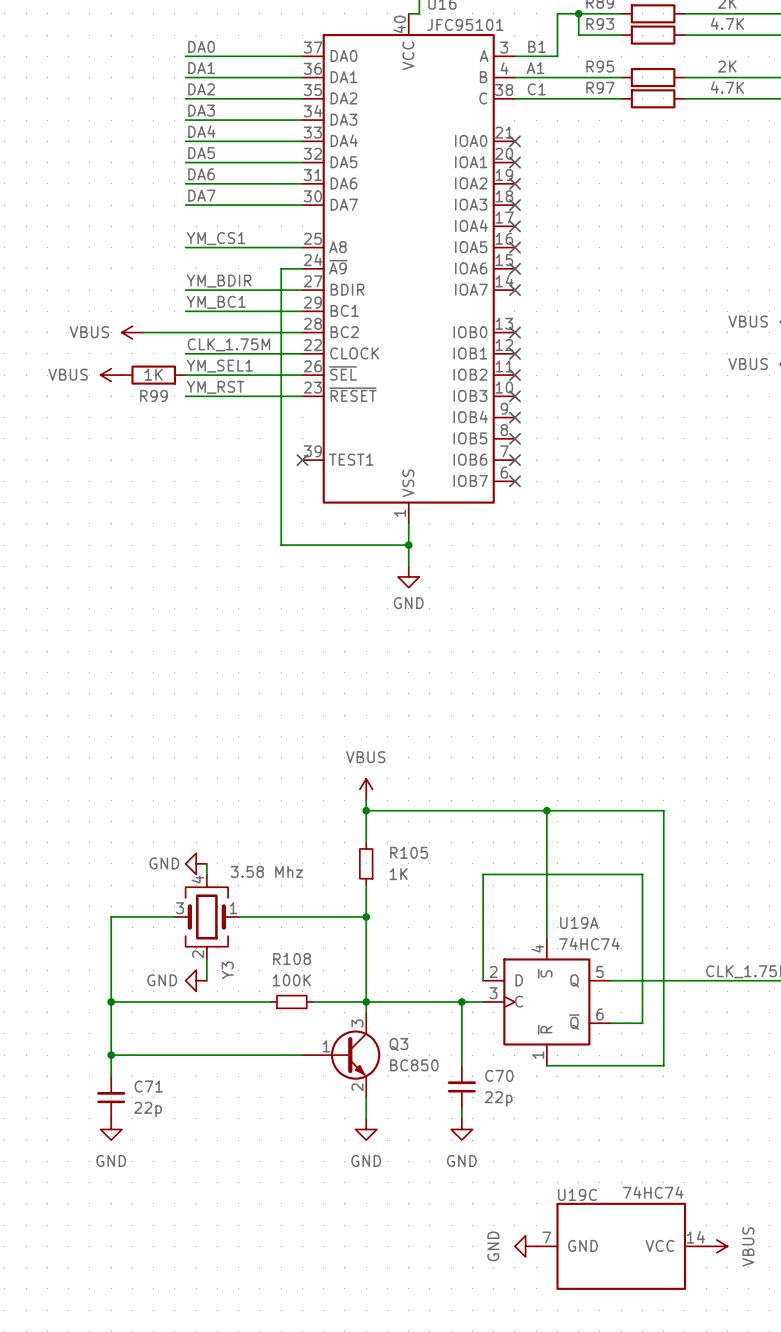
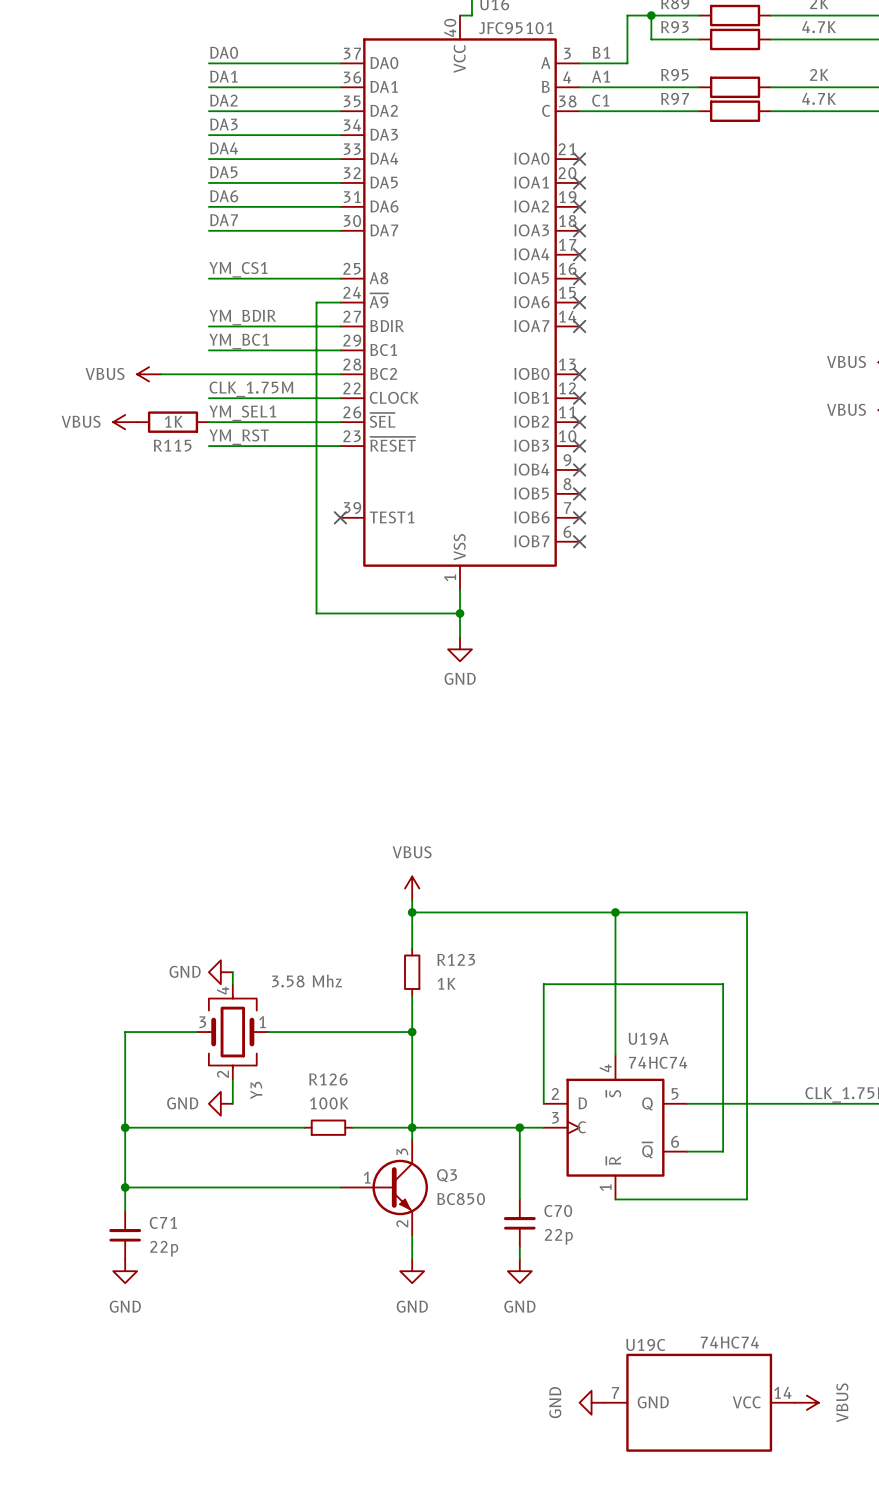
R99 name: R99 (153, 395) -> R115 (172, 445)
R105 name: R105 (409, 852) -> R123 (456, 959)
R108 name: R108 (292, 959) -> R126 (328, 1079)

